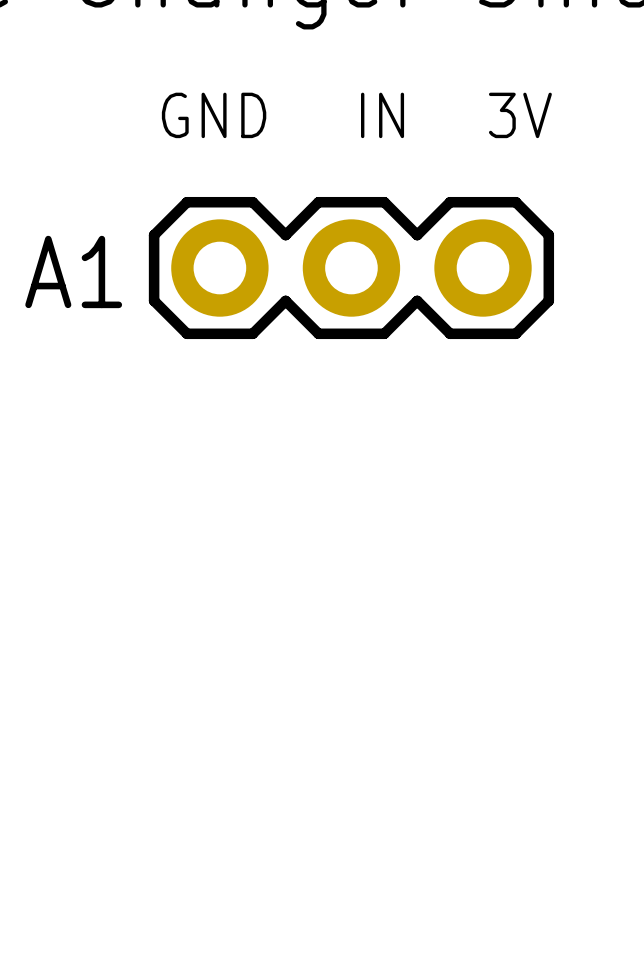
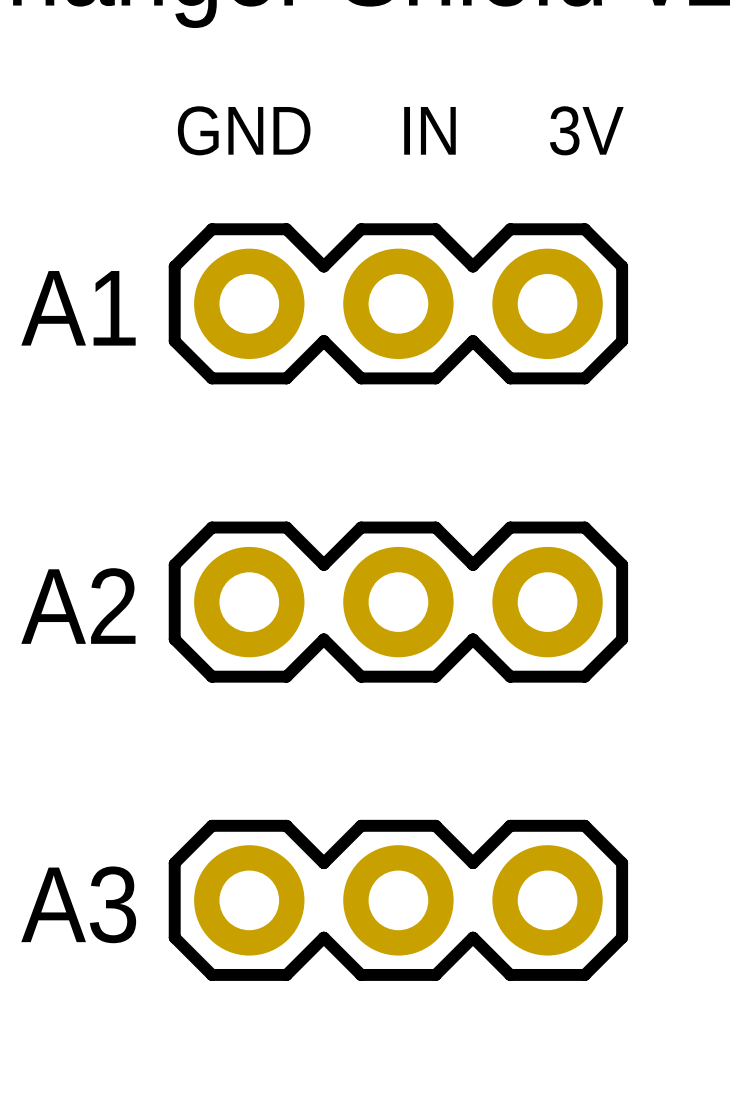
A2: none -> (398, 602)
A3: none -> (398, 900)

